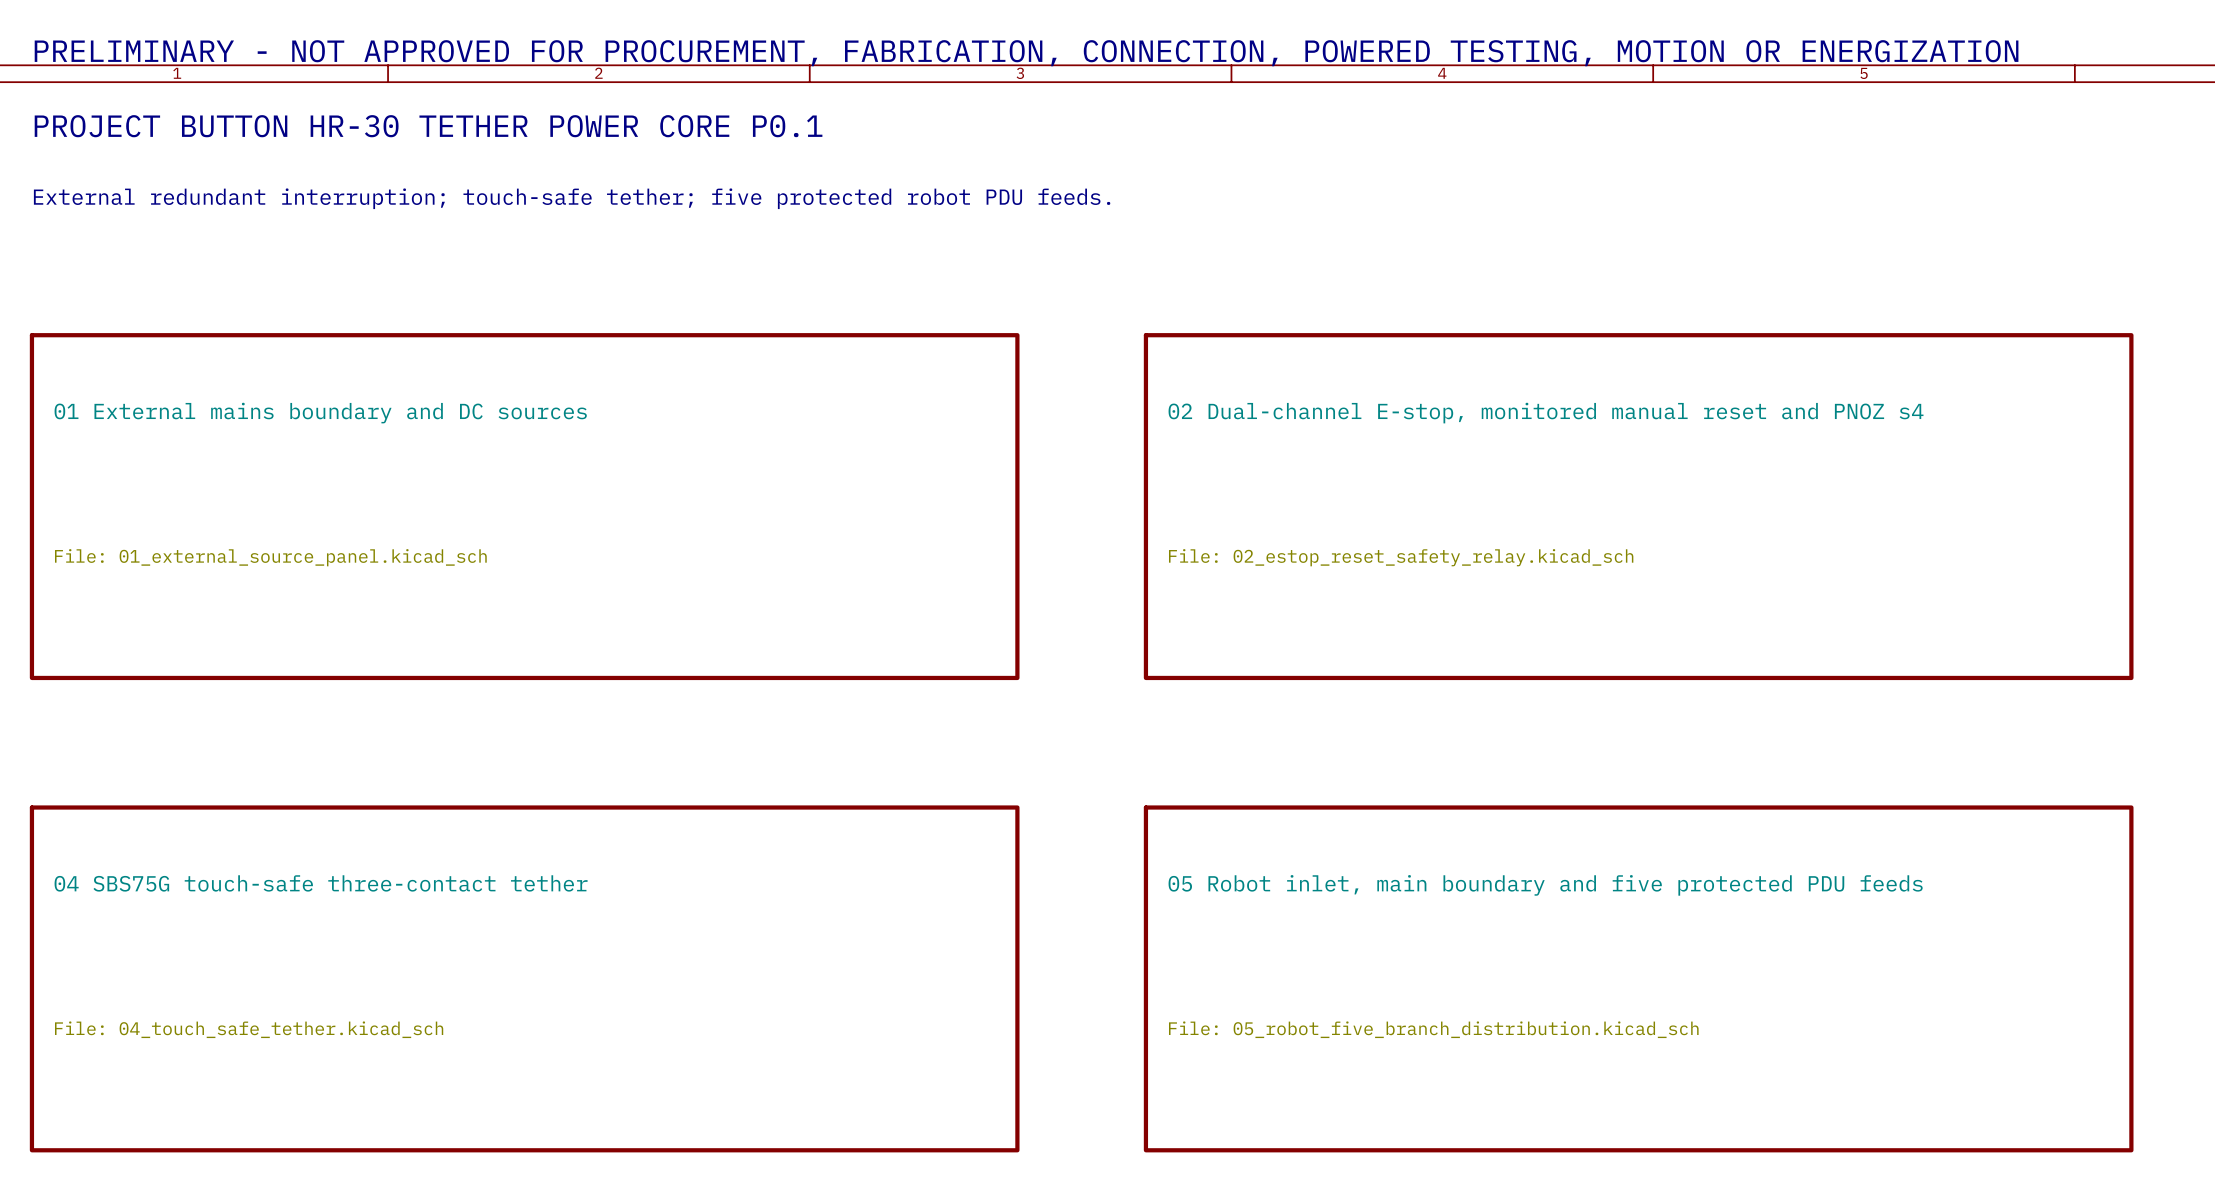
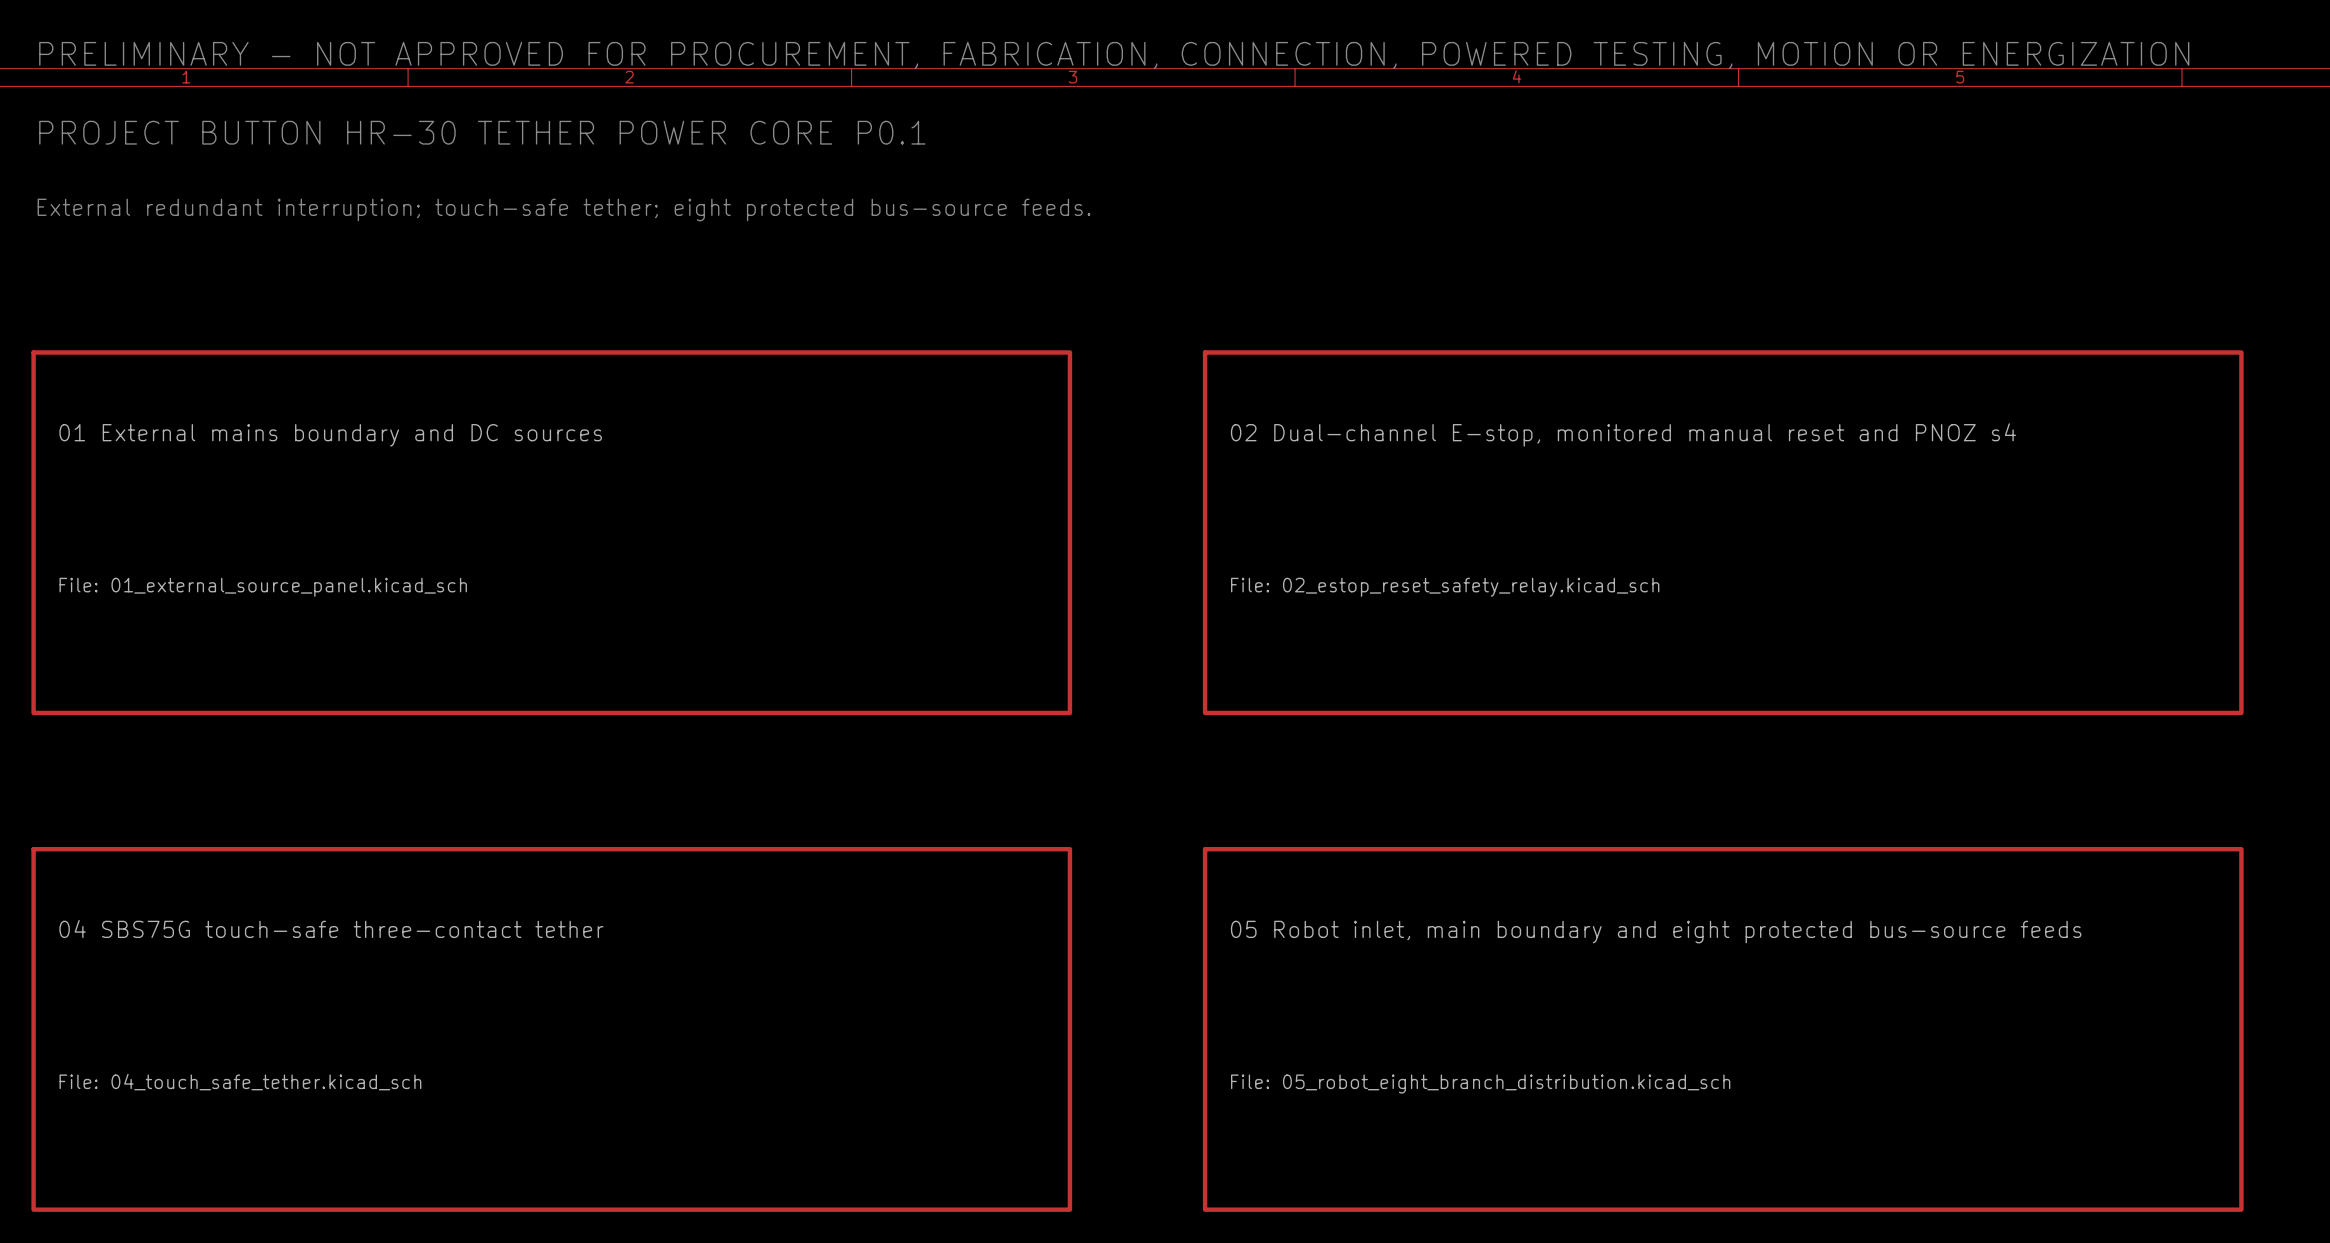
text: External redundant interruption; touch-safe tether; five protected robot PDU feeds. (572, 198) -> External redundant interruption; touch-safe tether; eight protected bus-source feeds. (564, 209)
sheet 05 Robot inlet, main boundary and five protected PDU feeds name: 05 Robot inlet, main boundary and five protected PDU feeds (1545, 885) -> 05 Robot inlet, main boundary and eight protected bus-source feeds (1656, 932)
sheet 05 Robot inlet, main boundary and five protected PDU feeds value: File: 05_robot_five_branch_distribution.kicad_sch (1433, 1029) -> File: 05_robot_eight_branch_distribution.kicad_sch (1480, 1083)

